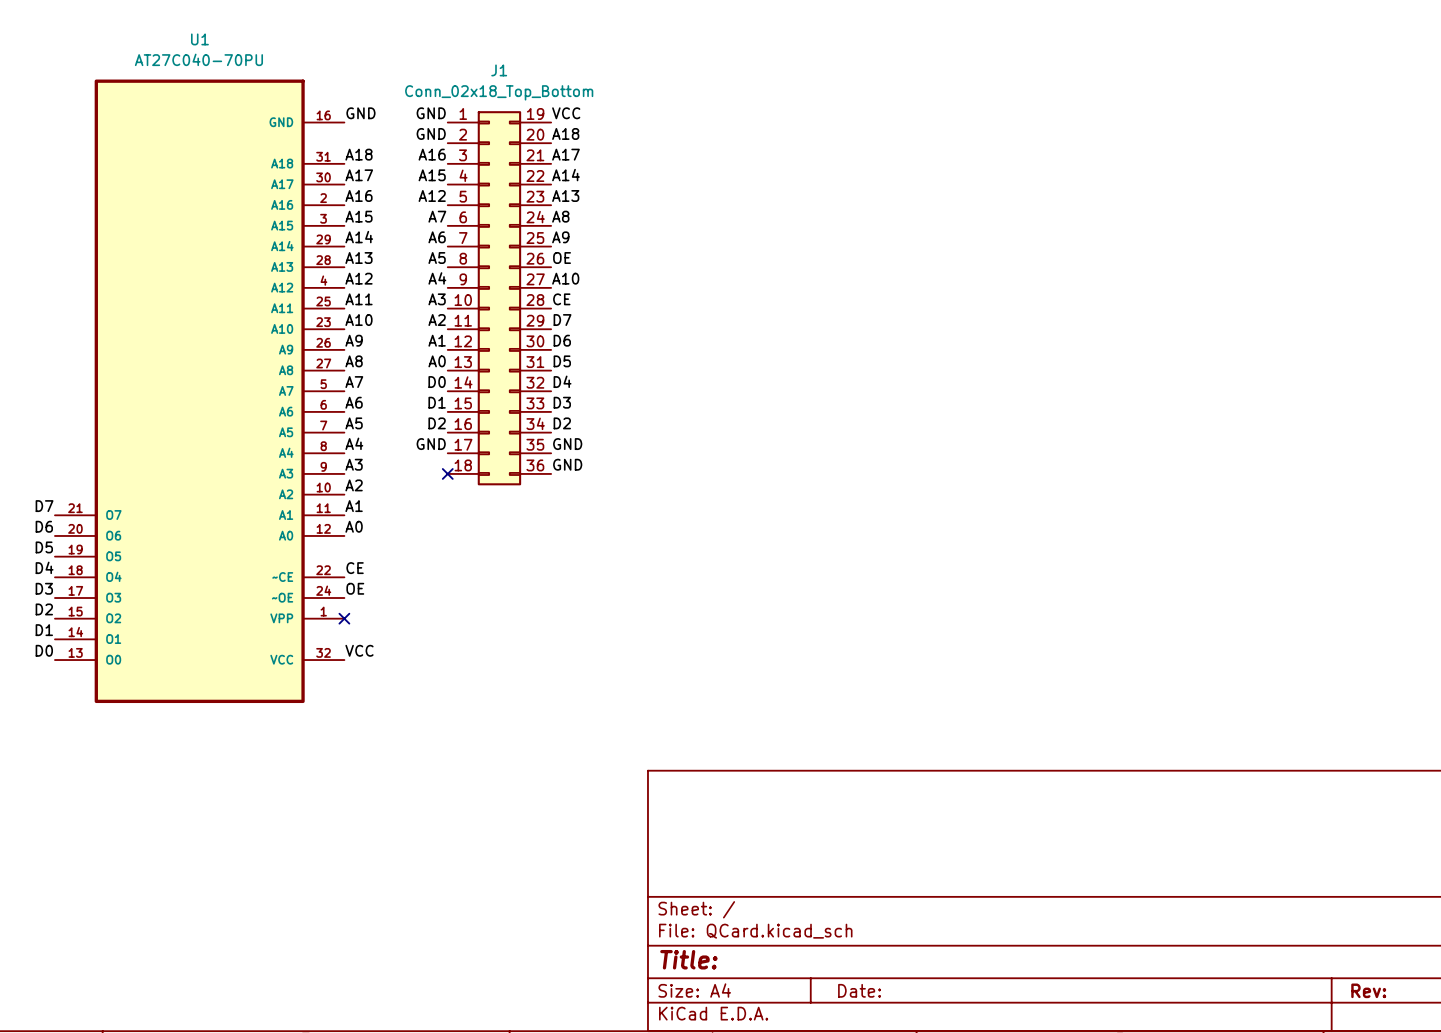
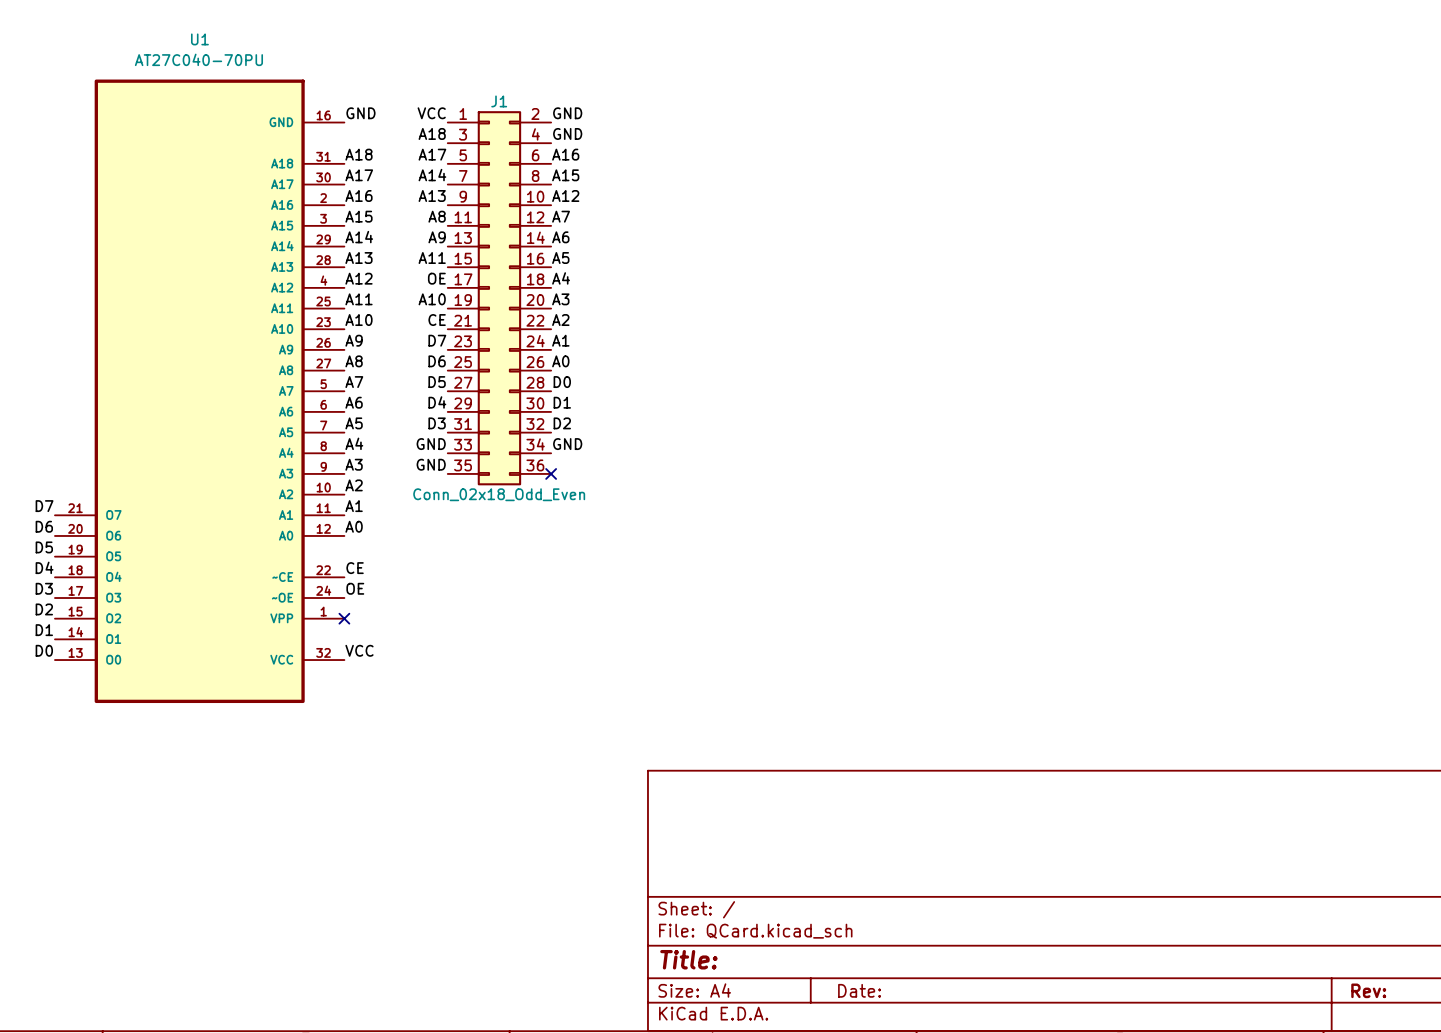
J1 name position: J1 (499, 70) -> J1 (499, 101)
J1 value: Conn_02x18_Top_Bottom (499, 92) -> Conn_02x18_Odd_Even (499, 494)
J1 symbol: [447, 111, 552, 486] -> [447, 111, 552, 486]
label: GND (431, 113) -> VCC (431, 113)
label: VCC (566, 113) -> GND (567, 113)
label: GND (431, 133) -> A18 (432, 133)
label: A18 (565, 133) -> GND (567, 133)
label: A16 (432, 154) -> A17 (432, 154)
label: A17 (565, 154) -> A16 (565, 154)
label: A15 (432, 175) -> A14 (432, 175)
label: A14 (565, 175) -> A15 (565, 175)
label: A12 (432, 195) -> A13 (432, 195)
label: A13 (565, 195) -> A12 (565, 195)
label: A7 (437, 216) -> A8 (437, 216)
label: A8 (560, 216) -> A7 (561, 216)
label: A6 (437, 237) -> A9 (437, 237)
label: A9 (560, 237) -> A6 (560, 237)
label: A5 (437, 258) -> A11 (432, 258)
label: OE (562, 258) -> A5 (560, 258)
label: A4 (437, 278) -> OE (436, 278)
label: A10 (565, 278) -> A4 (561, 278)
label: A3 (437, 299) -> A10 (432, 299)
label: CE (561, 299) -> A3 (560, 299)
label: A2 (437, 320) -> CE (437, 320)
label: D7 (562, 320) -> A2 (560, 320)
label: A1 (437, 340) -> D7 (437, 340)
label: D6 (562, 340) -> A1 (560, 340)
label: A0 (437, 361) -> D6 (437, 361)
label: D5 (562, 361) -> A0 (560, 361)
label: D4 (562, 381) -> D0 (562, 382)
label: D0 (437, 382) -> D5 (437, 382)
label: D1 (437, 402) -> D4 (437, 402)
label: D3 (562, 402) -> D1 (562, 402)
label: D2 (437, 423) -> D3 (437, 423)
label position: GND (567, 464) -> GND (431, 464)
no-connect mark: (447, 473) -> none
no-connect mark: none -> (551, 473)

